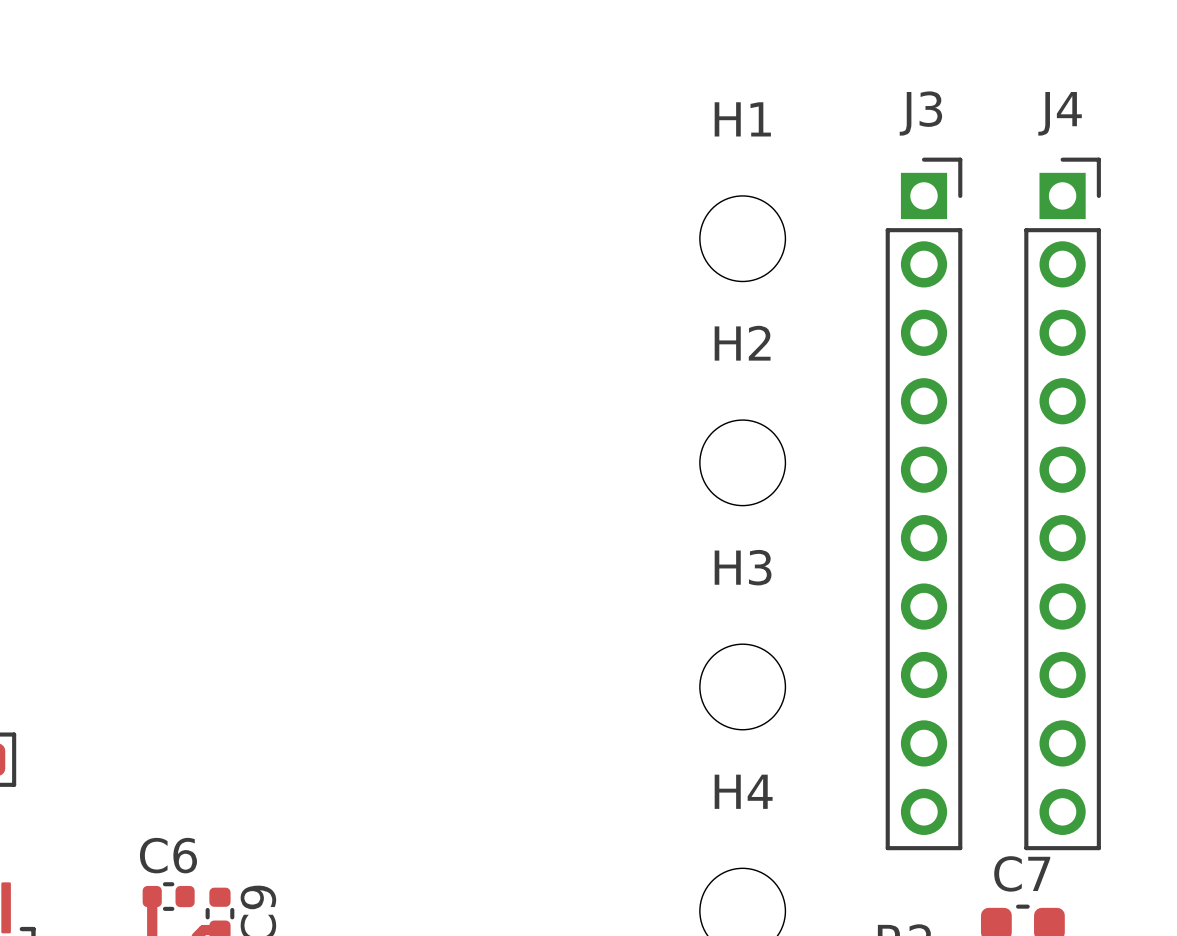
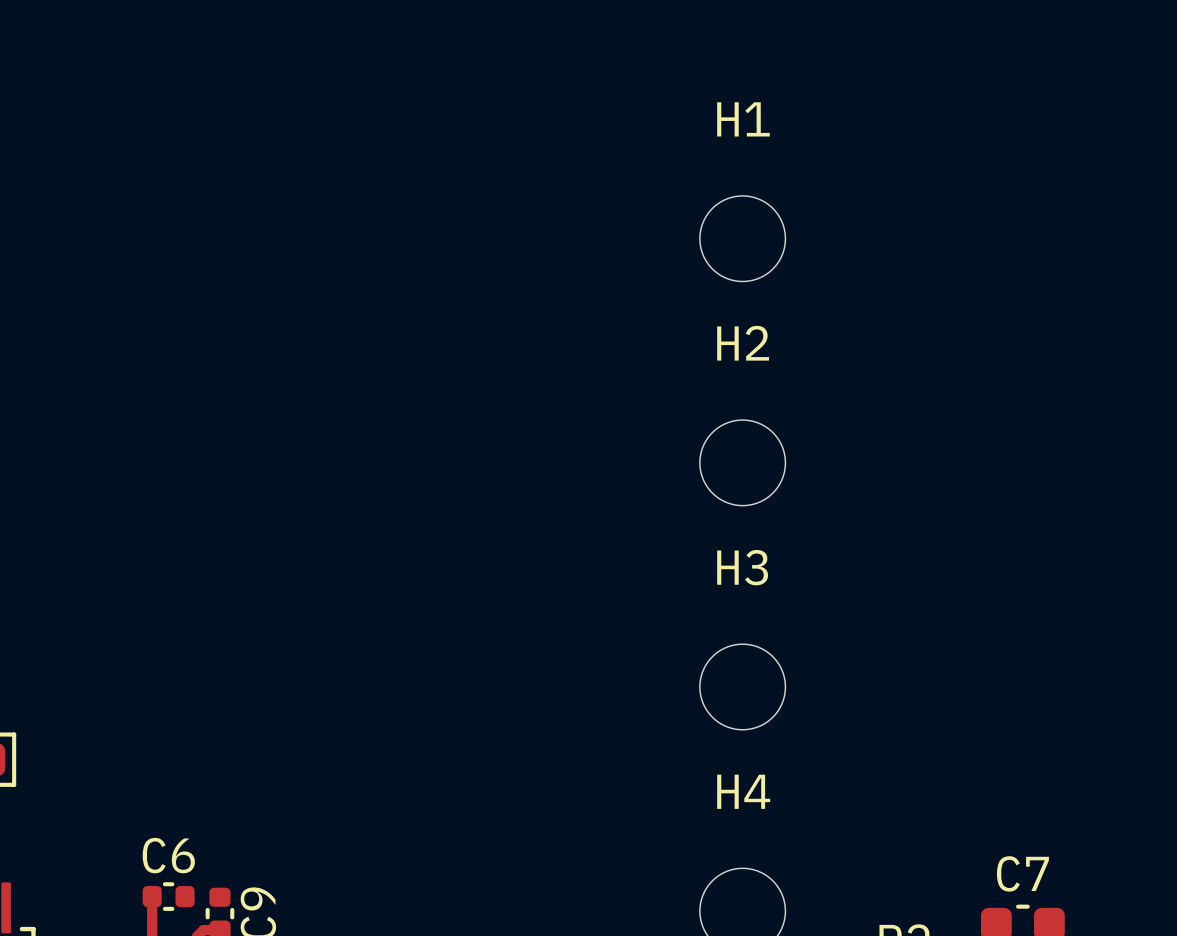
J3: (924, 503) -> none
J4: (1062, 503) -> none

